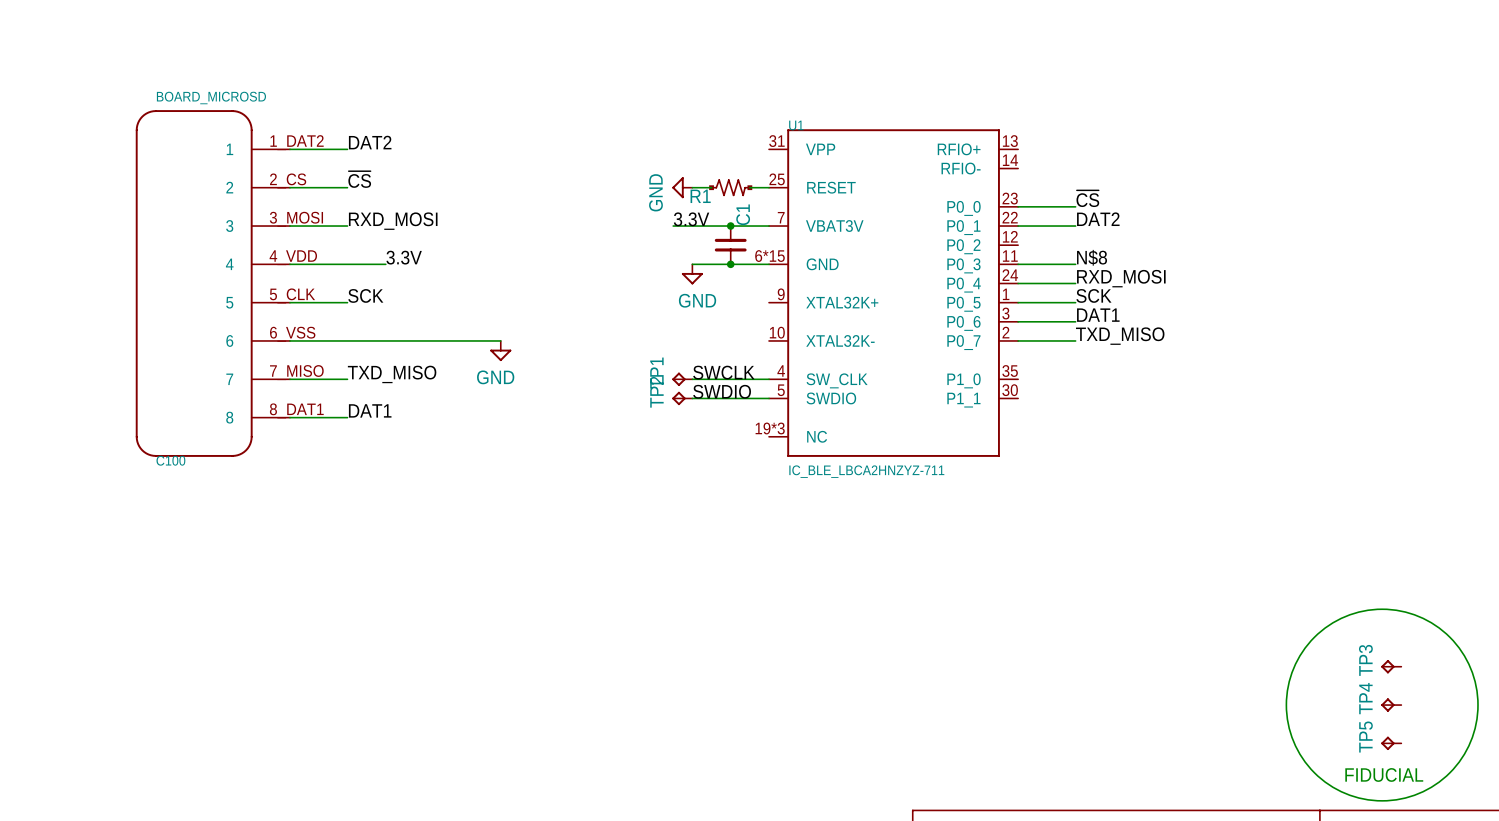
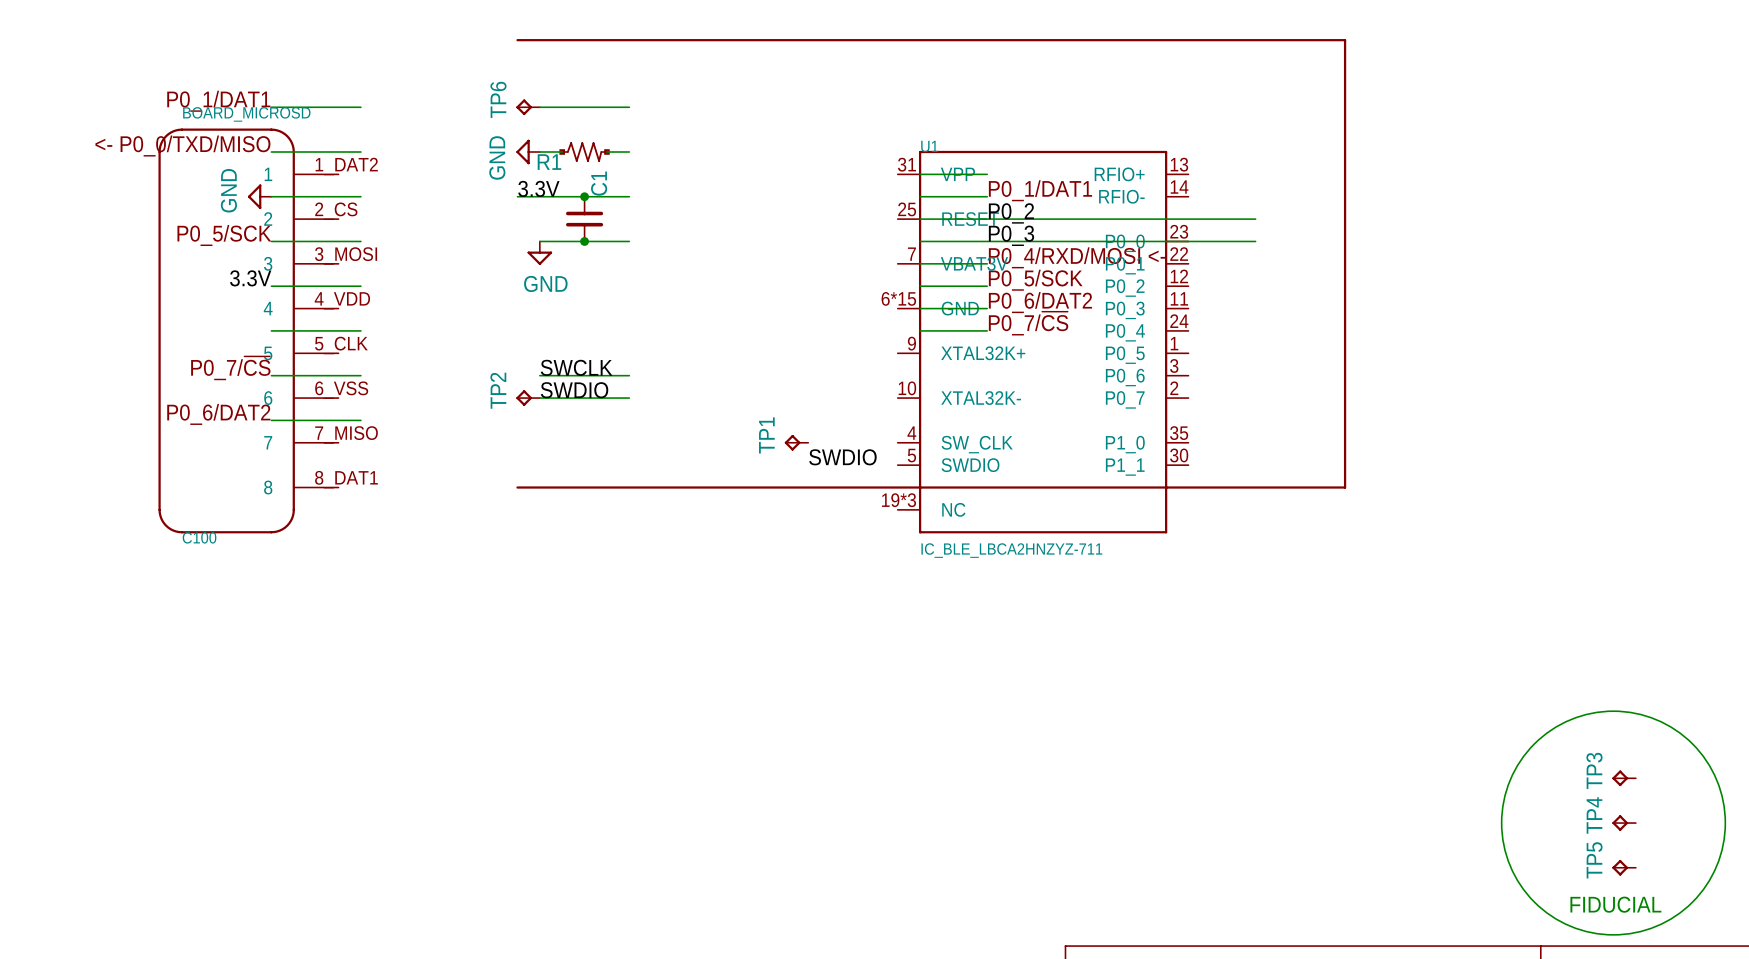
line: none -> (517, 40) (1345, 40) (1345, 487) (517, 487)
text: none -> P0_1/DAT1 (218, 101)
wire: none -> (271, 107) (360, 107)
TP6: none -> (528, 107)
wire: none -> (539, 107) (629, 107)
text: none -> <- P0_0/TXD/MISO (182, 146)
wire: none -> (271, 152) (360, 152)
power symbol: none -> GND (528, 152)
wire: none -> (539, 152) (562, 152)
label: DAT2 (370, 142) -> none
wire: (290, 149) (347, 149) -> none
wire: none -> (920, 174) (987, 174)
label: none -> 3.3V (538, 188)
text: none -> P0_1/DAT1 (1040, 190)
power symbol: none -> GND (260, 196)
wire: none -> (271, 196) (360, 196)
junction: none -> (584, 196)
wire: none -> (920, 196) (987, 196)
label: ~{CS} (359, 179) -> none
label: none -> P0_2 (1011, 213)
wire: (290, 187) (347, 187) -> none
power symbol: GND (682, 187) -> none
wire: (692, 187) (711, 187) -> (606, 152) (629, 152)
R1 position: (730, 187) -> (584, 152)
wire: (749, 187) (769, 187) -> none
wire: none -> (920, 219) (1255, 219)
label: ~{CS} (1087, 198) -> none
text: none -> P0_5/SCK (224, 235)
label: none -> P0_3 (1011, 235)
wire: none -> (271, 241) (360, 241)
wire: none -> (539, 241) (629, 241)
junction: none -> (584, 241)
wire: none -> (920, 241) (1188, 241)
power symbol: none -> GND (539, 252)
label: 3.3V (691, 219) -> none
label: DAT2 (1098, 219) -> none
text: none -> P0_4/RXD/MOSI <- (1077, 257)
label: RXD_MOSI (393, 221) -> none
wire: (290, 226) (347, 226) -> none
wire: (673, 226) (769, 226) -> none
junction: (730, 226) -> none
wire: none -> (920, 263) (987, 263)
wire: (1018, 226) (1075, 226) -> none
label: none -> 3.3V (250, 278)
text: none -> P0_5/SCK (1035, 280)
wire: none -> (271, 286) (360, 286)
C1 position: (730, 245) -> (584, 219)
wire: none -> (920, 286) (987, 286)
label: 3.3V (404, 257) -> none
label: N$8 (1092, 257) -> none
text: none -> P0_6/DAT2 (1040, 302)
wire: (290, 264) (385, 264) -> (517, 196) (629, 196)
wire: (692, 264) (769, 264) -> none
junction: (730, 264) -> none
wire: none -> (920, 308) (987, 308)
wire: (1018, 264) (1075, 264) -> none
power symbol: GND (692, 274) -> none
text: none -> P0_7/~{CS} (1028, 323)
label: RXD_MOSI (1121, 278) -> none
wire: none -> (271, 330) (360, 330)
wire: none -> (920, 330) (987, 330)
wire: (1018, 283) (1075, 283) -> none
label: SCK (365, 295) -> none
label: SCK (1093, 295) -> none
wire: (290, 302) (347, 302) -> none
wire: (1018, 302) (1075, 302) -> none
text: none -> P0_7/~{CS} (230, 368)
label: none -> SWCLK (576, 367)
label: DAT1 (1098, 315) -> none
wire: none -> (271, 375) (360, 375)
wire: none -> (539, 375) (629, 375)
wire: (1018, 321) (1075, 321) -> none
label: none -> SWDIO (574, 390)
label: TXD_MISO (1120, 336) -> none
wire: (290, 340) (462, 340) -> none
wire: none -> (584, 398) (629, 398)
wire: (1018, 340) (1075, 340) -> none
power symbol: GND (500, 350) -> none
text: none -> P0_6/DAT2 (218, 414)
wire: none -> (271, 420) (360, 420)
label: SWCLK (723, 372) -> none
label: TXD_MISO (392, 374) -> none
wire: (290, 379) (347, 379) -> none
wire: (692, 379) (769, 379) -> none
TP2 position: (682, 398) -> (528, 398)
wire: (692, 398) (769, 398) -> none
label: DAT1 (370, 410) -> none
wire: (290, 417) (347, 417) -> none

